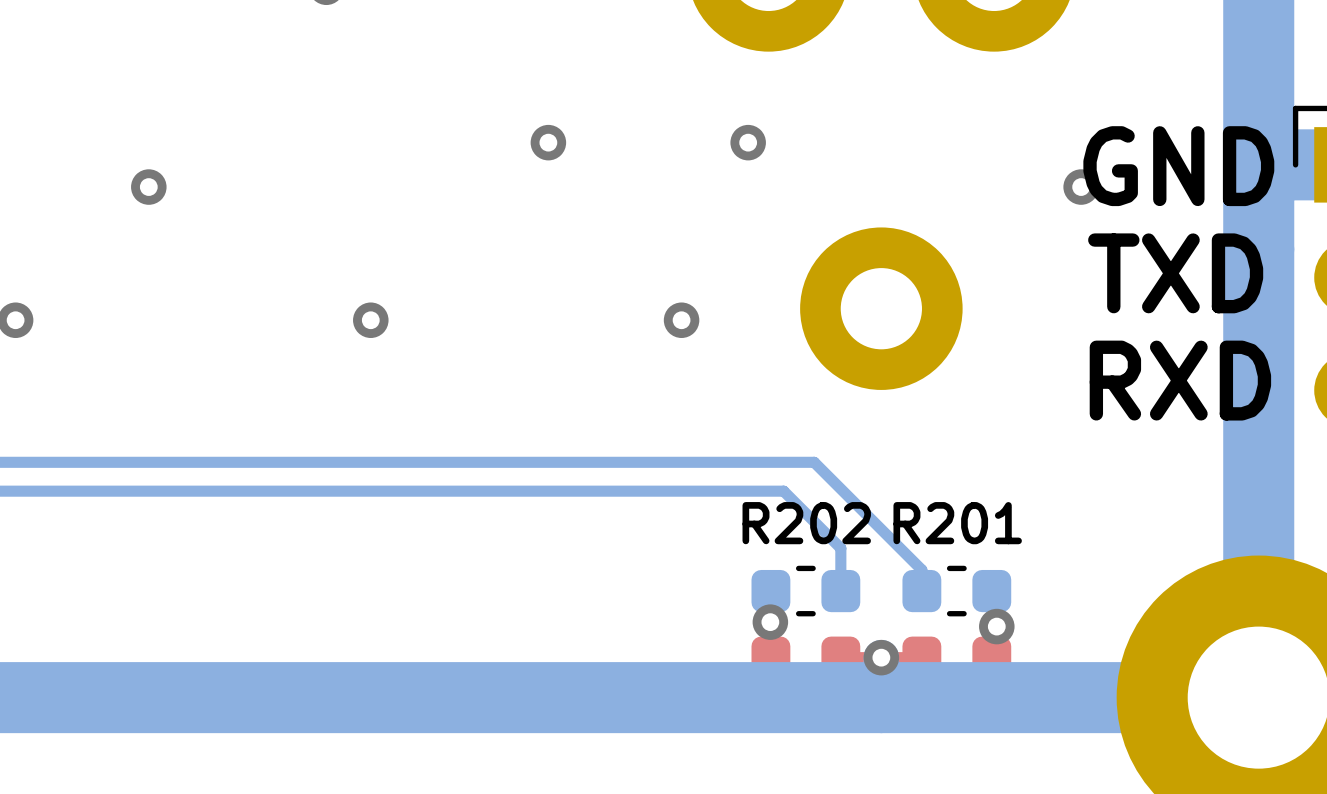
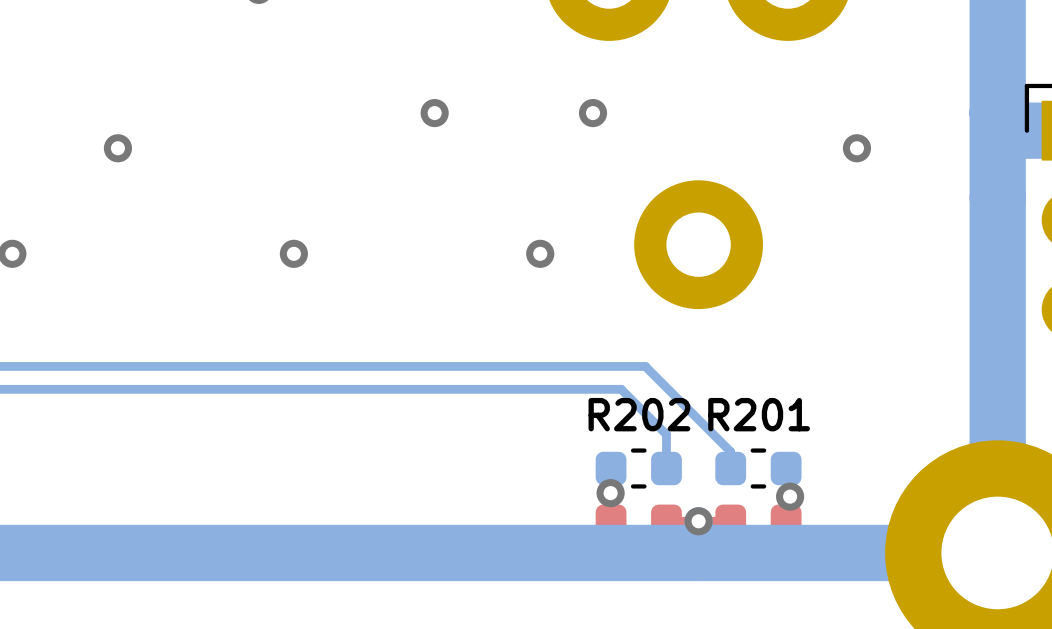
text: GND (1178, 166) -> none
text: TXD (1175, 273) -> none
text: RXD (1180, 380) -> none

